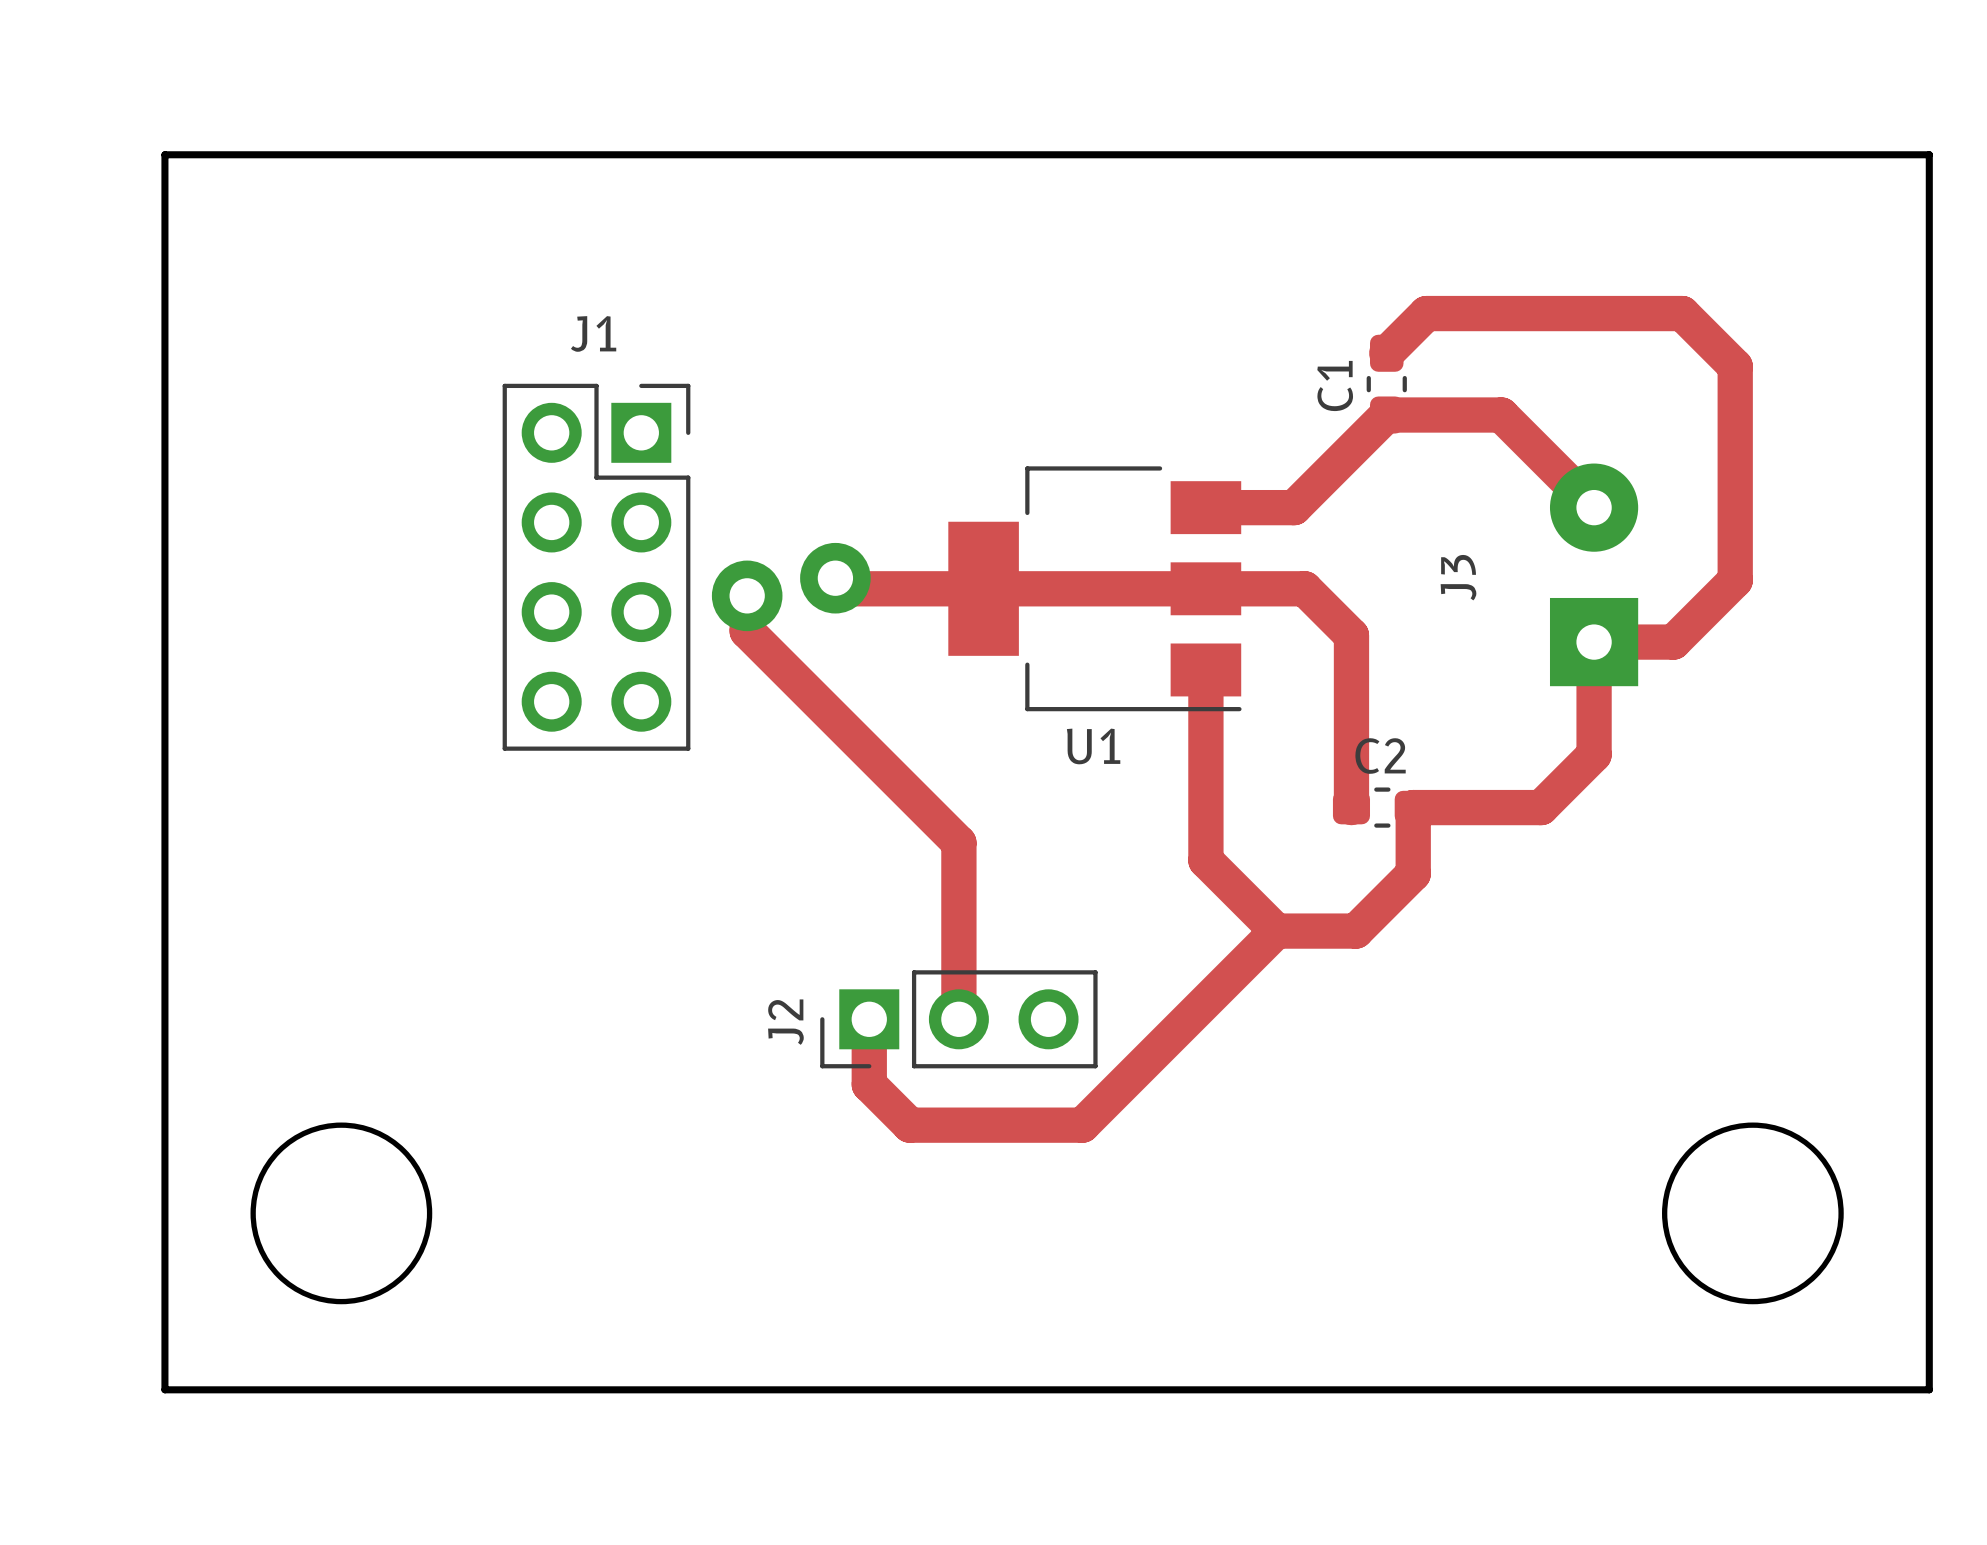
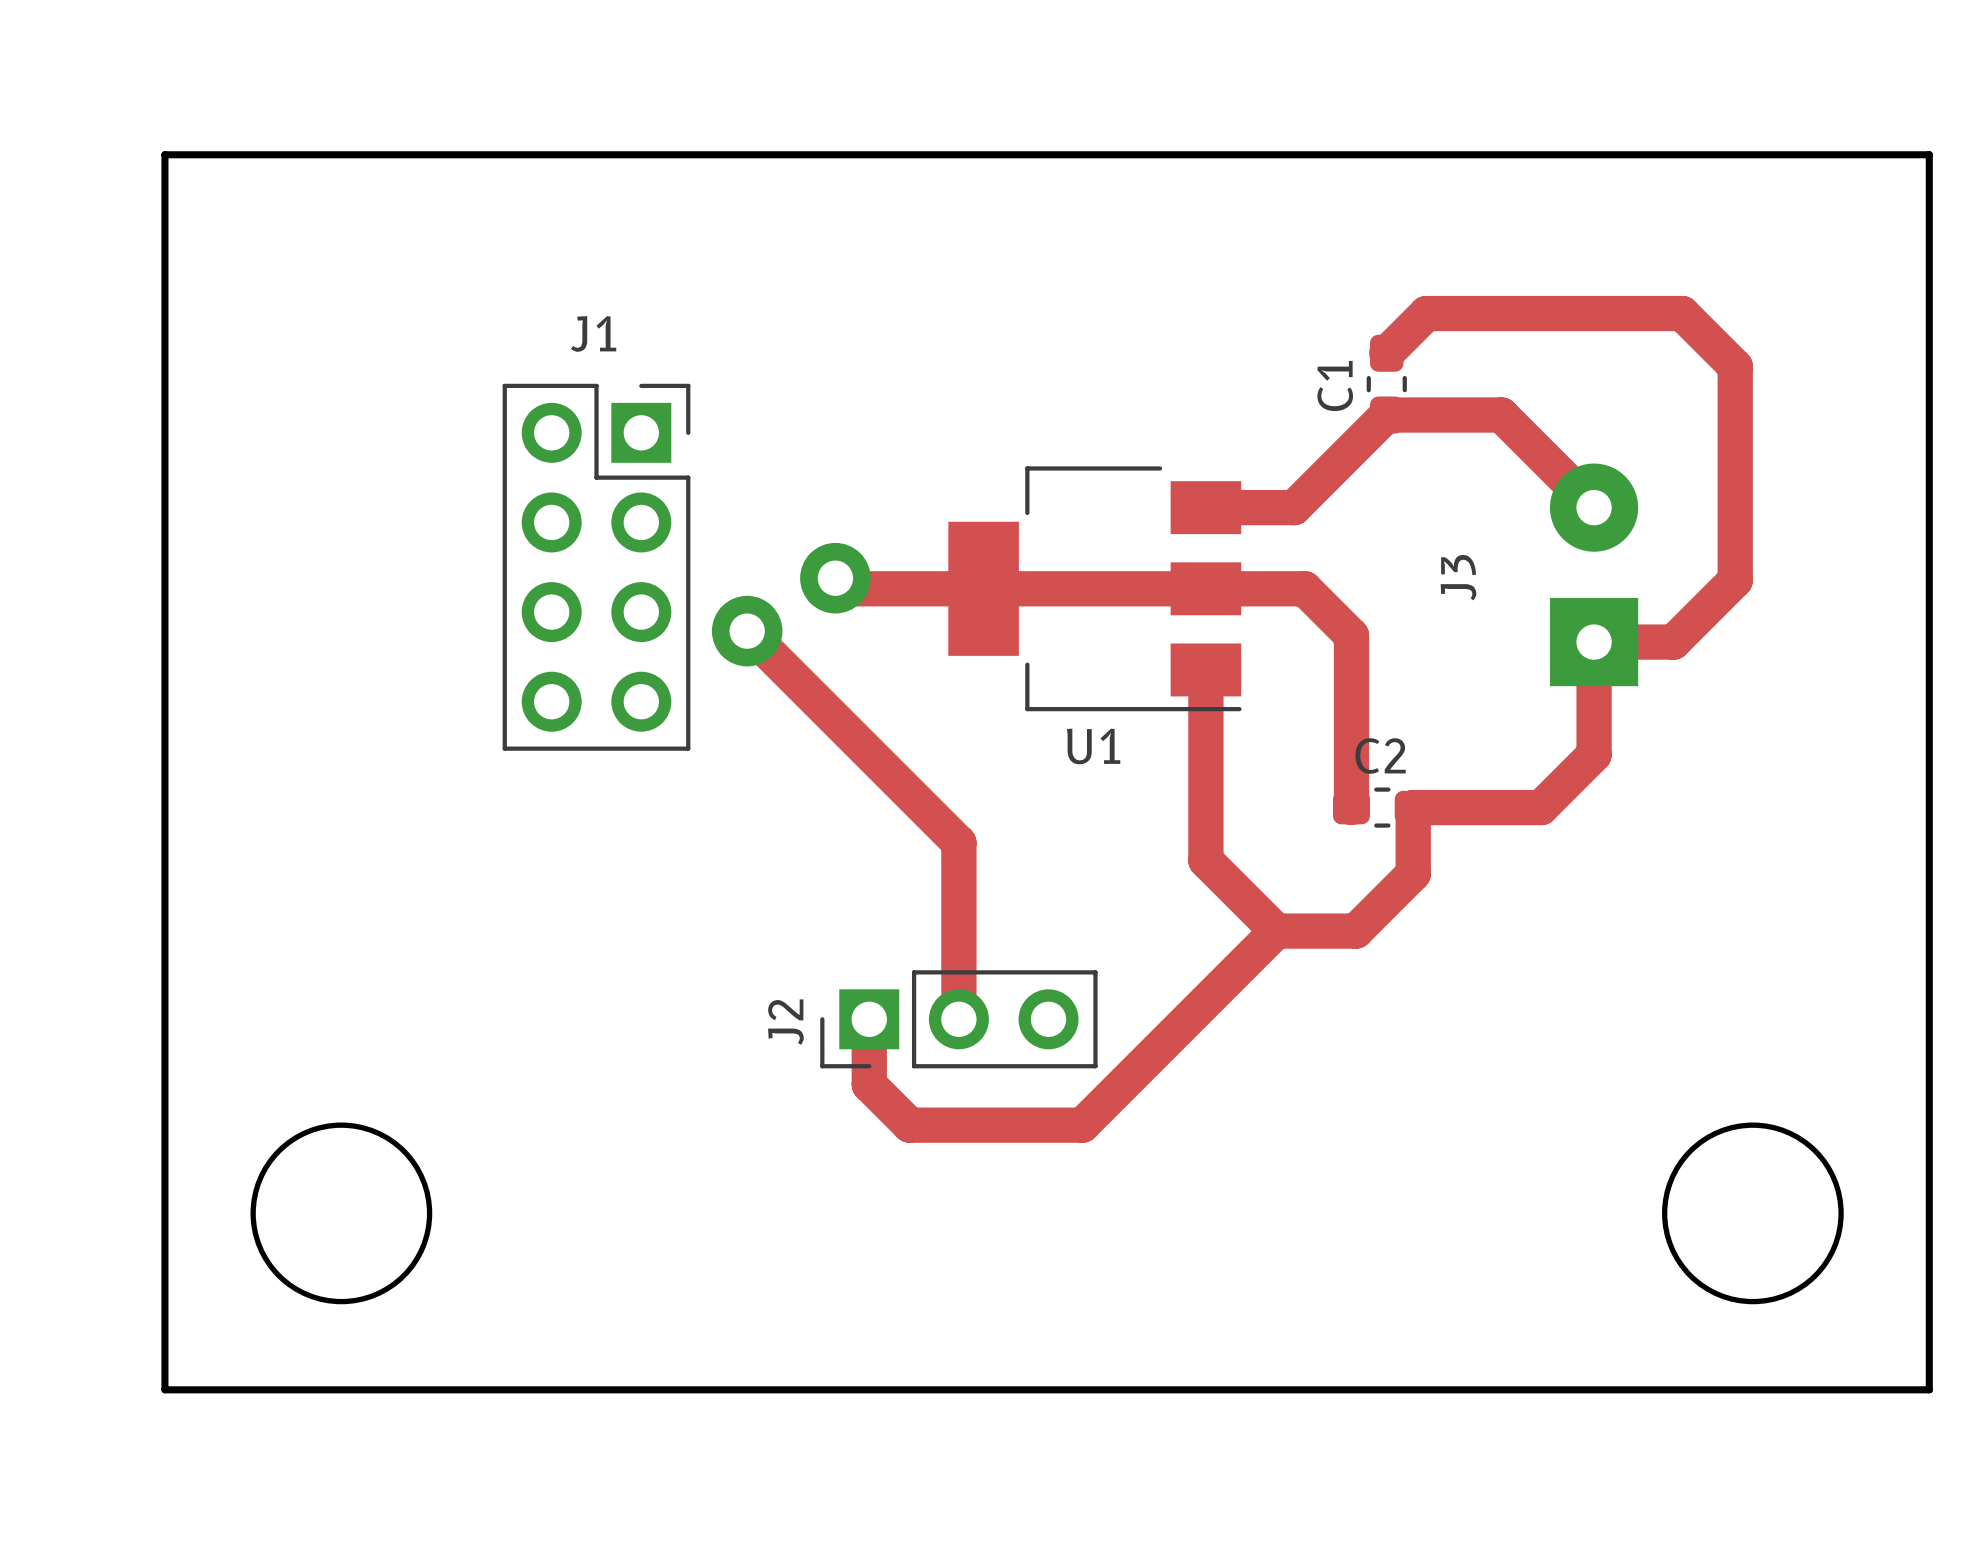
via position: (747, 595) -> (747, 631)

